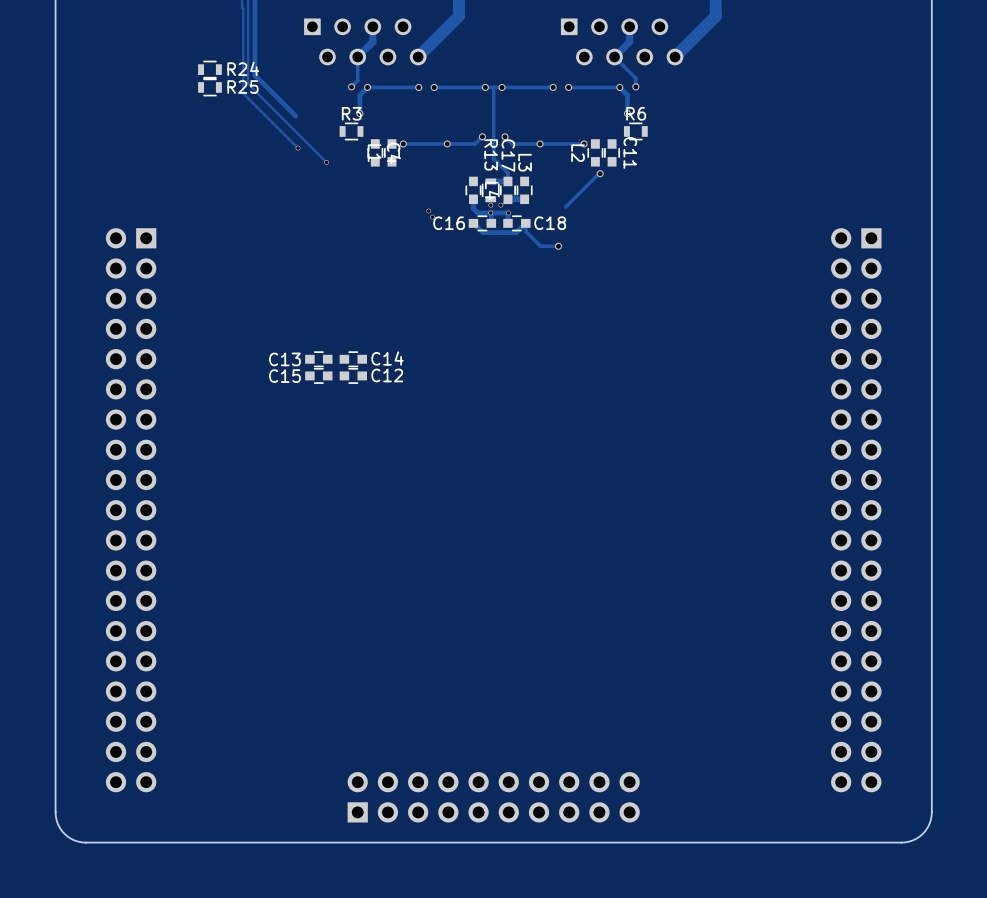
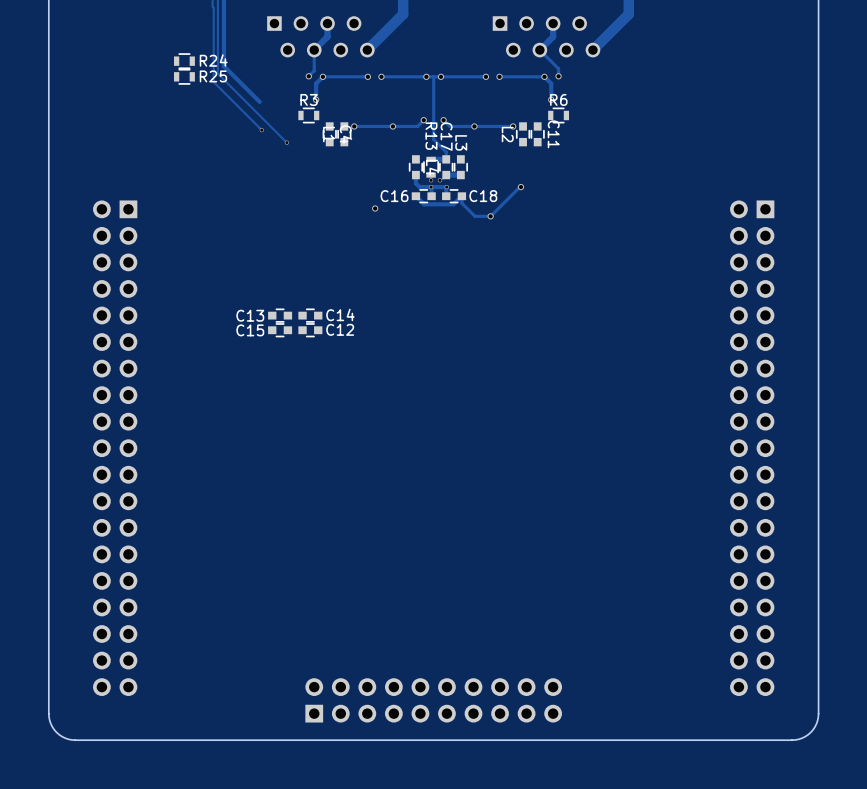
track: (600, 173) (565, 207) -> (520, 187) (490, 216)
via position: (600, 173) -> (520, 187)
via: (428, 211) -> none
via: (432, 217) -> none
via: none -> (375, 208)

